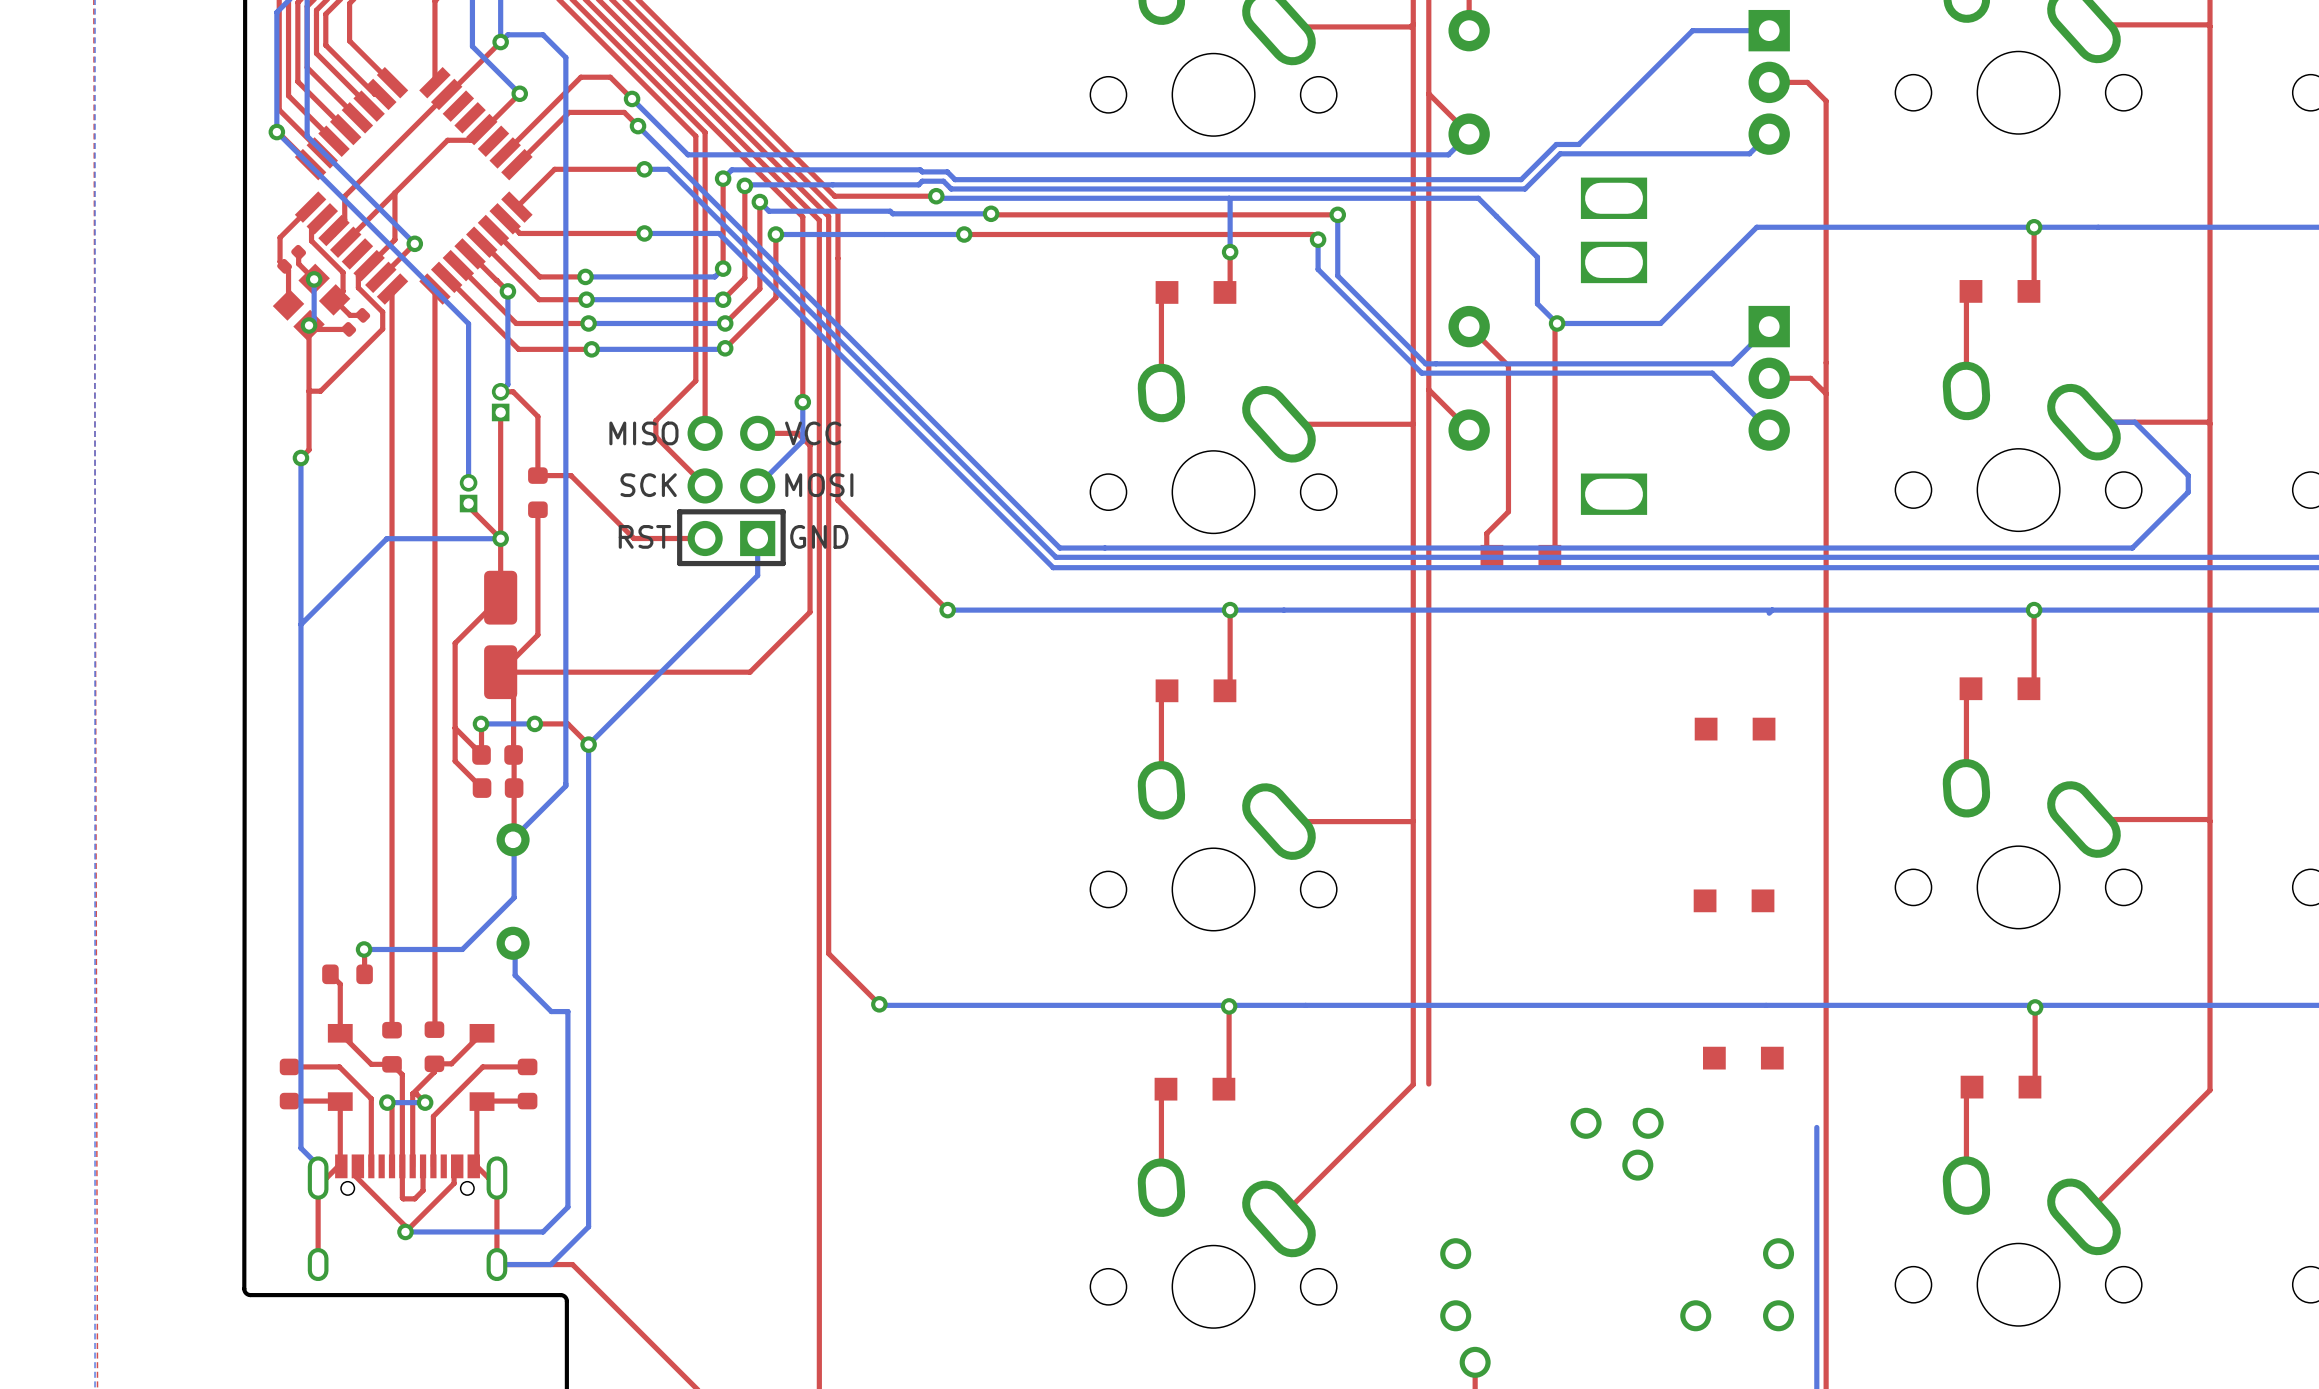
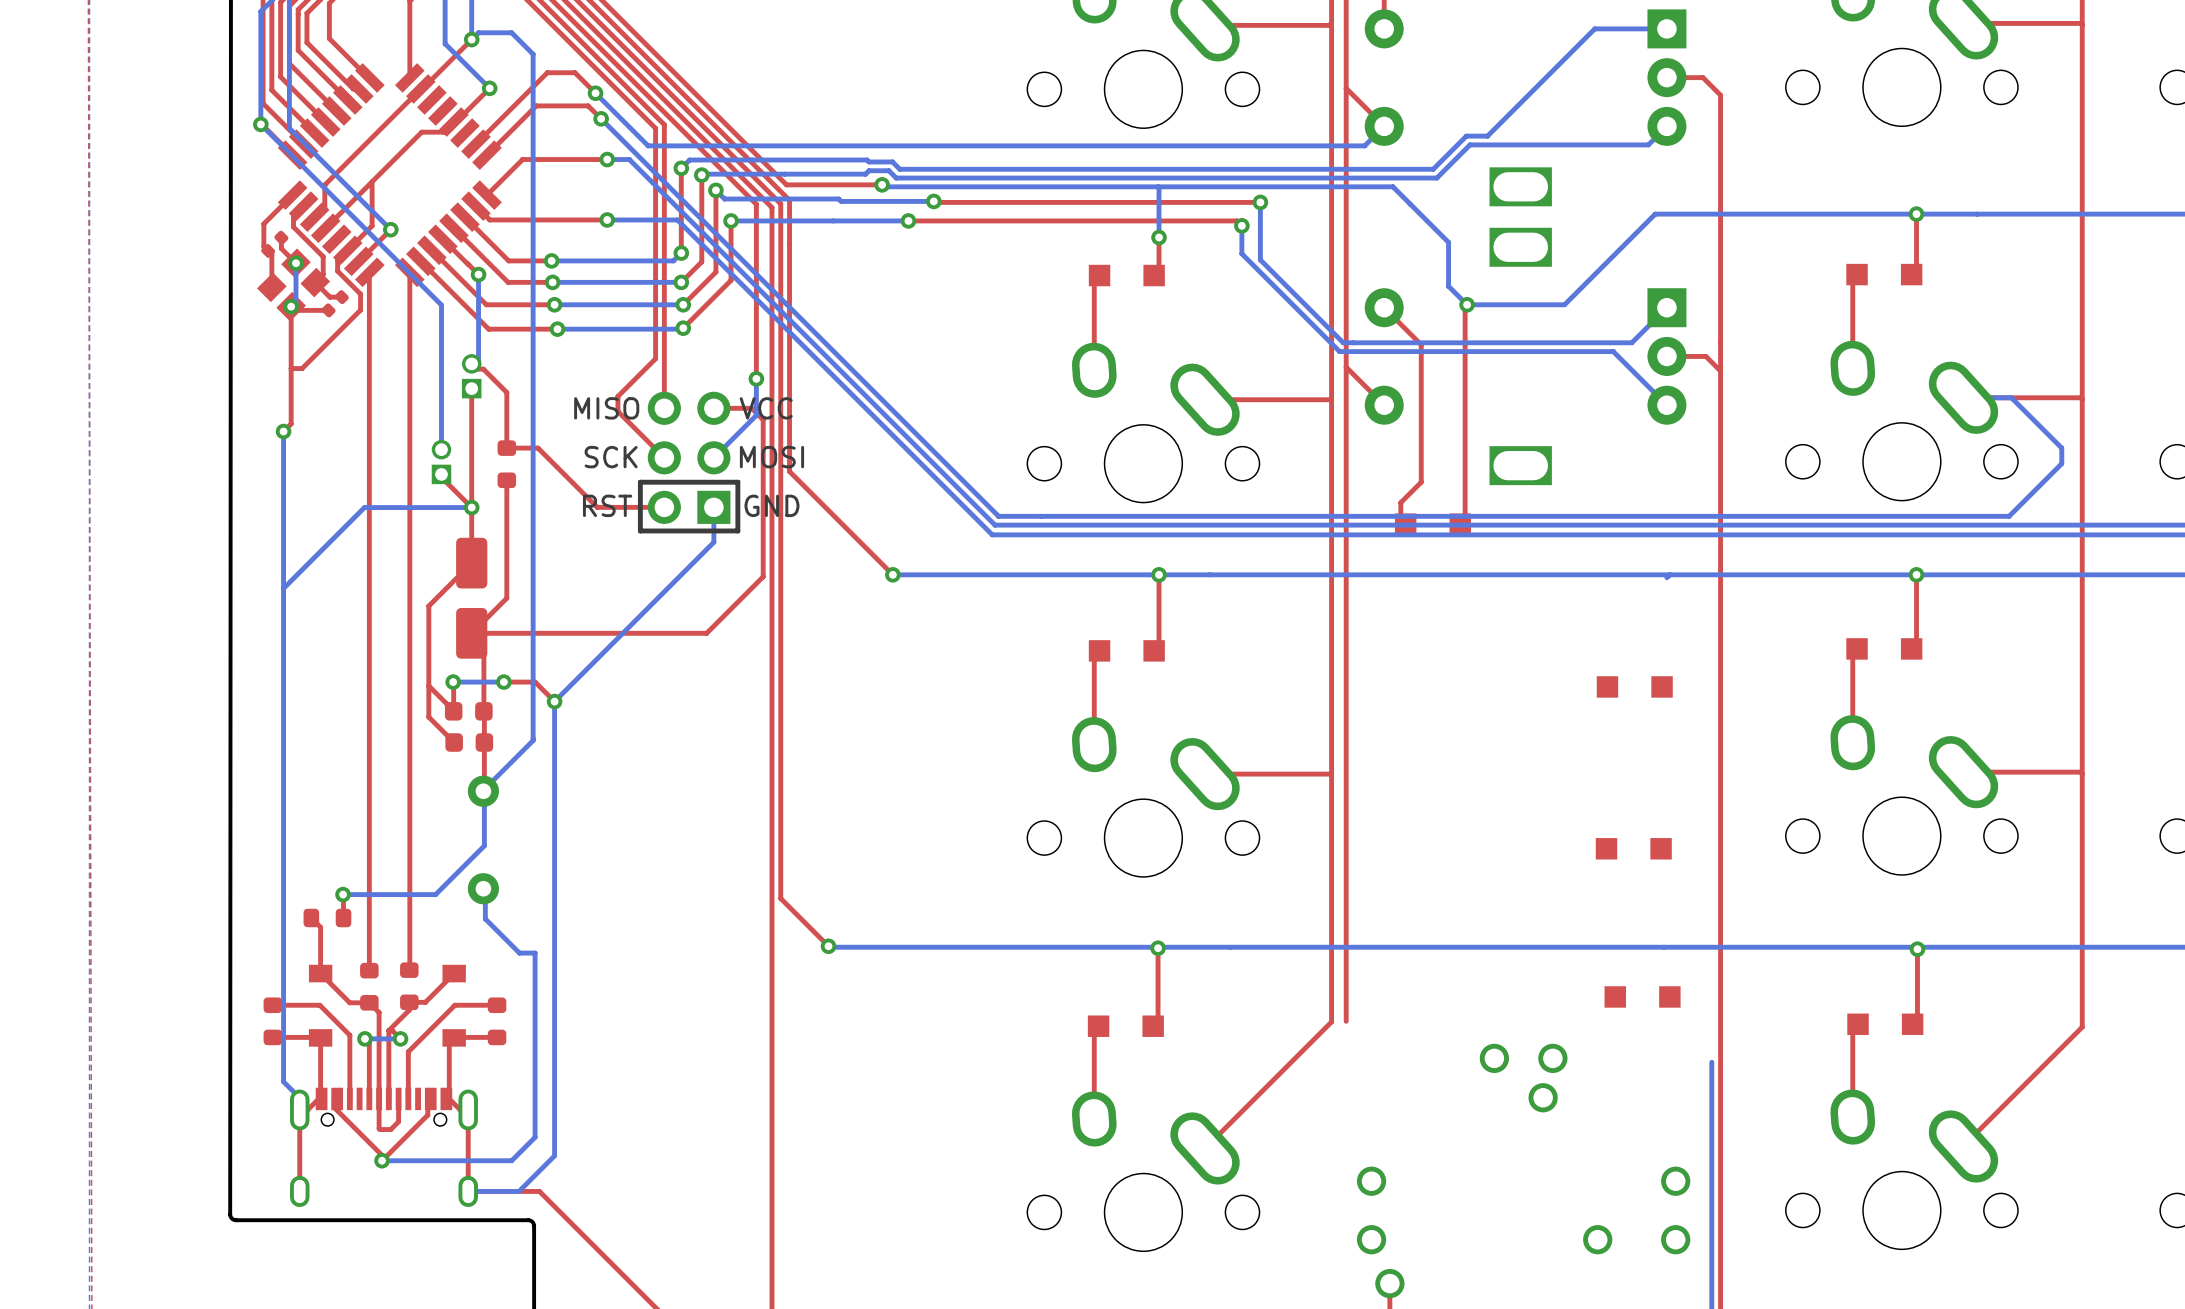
part footprint: [491, 382, 510, 422] -> [461, 354, 482, 399]
part footprint: [459, 474, 478, 513] -> [431, 439, 452, 485]

